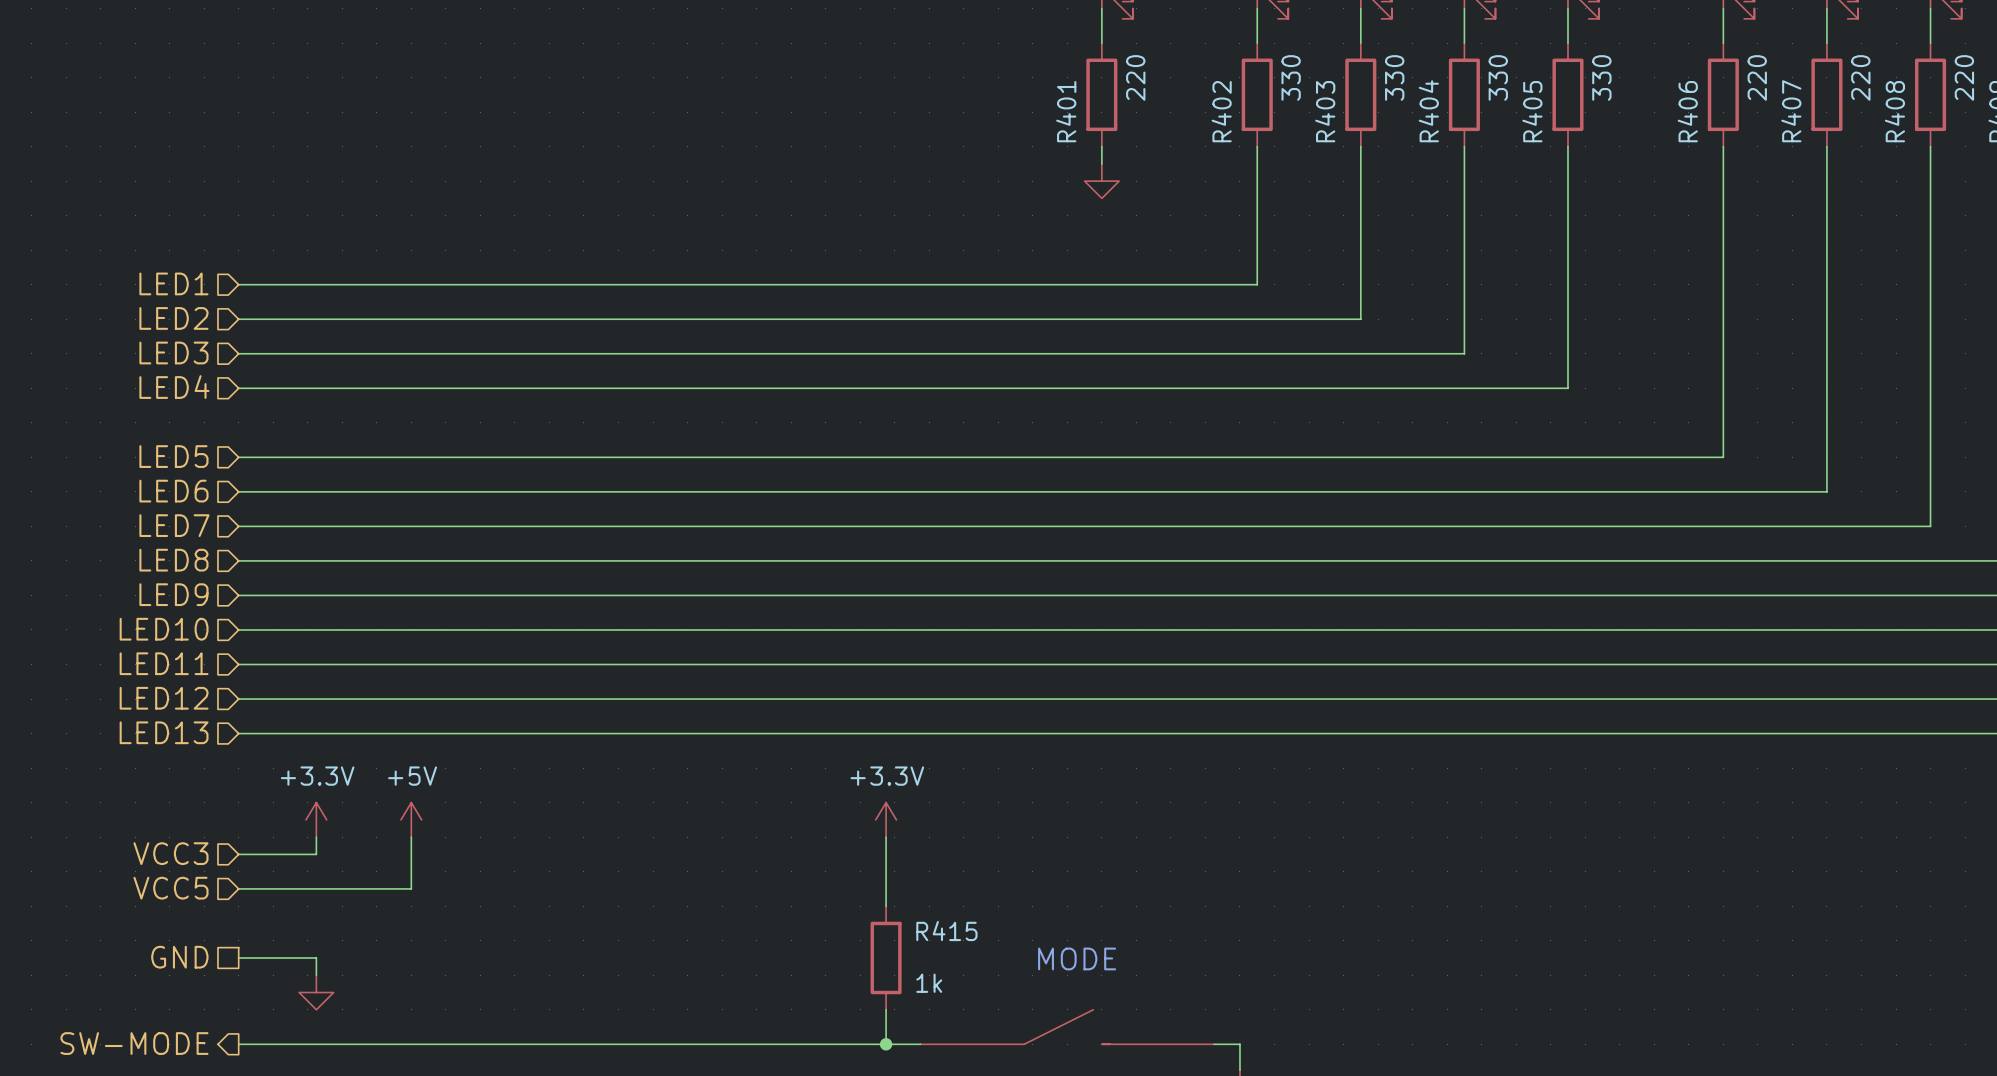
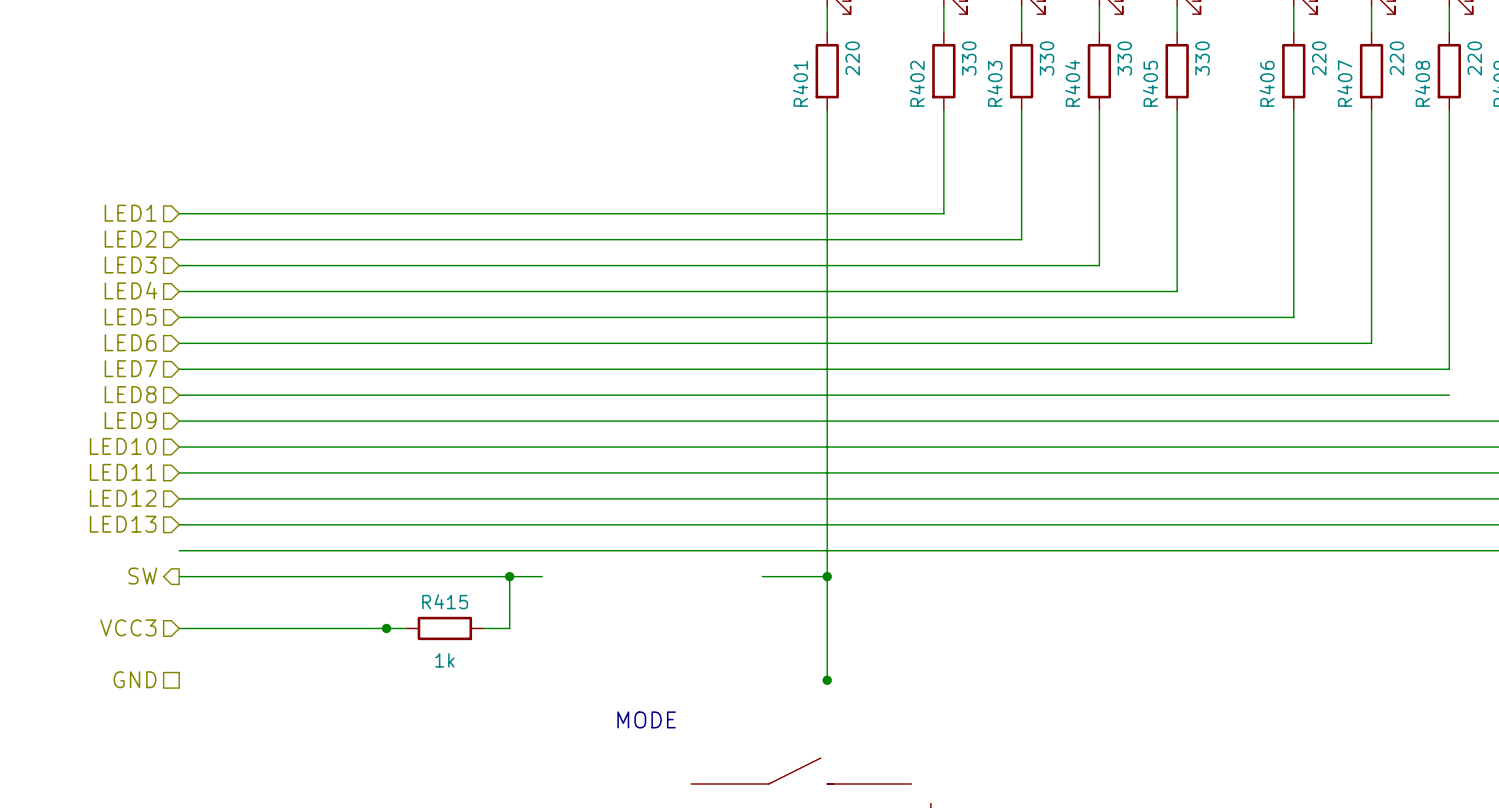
wire: none -> (827, 123) (827, 680)
power symbol: (1101, 181) -> none
hierarchical label: none -> LED5 (130, 316)
wire: none -> (179, 317) (1293, 317)
wire: (1723, 422) (1723, 457) -> (1371, 343) (1293, 343)
hierarchical label: LED5 (173, 456) -> LED6 (130, 342)
wire: (1826, 457) (1826, 491) -> none
hierarchical label: LED6 (173, 491) -> LED7 (130, 368)
wire: (1930, 491) (1930, 526) -> (1449, 369) (1371, 369)
hierarchical label: LED7 (174, 525) -> LED8 (130, 394)
hierarchical label: LED8 (173, 560) -> LED9 (130, 420)
hierarchical label: LED9 (173, 594) -> LED10 (123, 446)
hierarchical label: LED10 (164, 629) -> LED11 (123, 472)
hierarchical label: LED11 (164, 663) -> LED12 (123, 498)
hierarchical label: LED12 (164, 698) -> LED13 (123, 524)
hierarchical label: LED13 (164, 732) -> none
hierarchical label: none -> SW (142, 576)
wire: none -> (179, 576) (542, 576)
wire: none -> (509, 576) (509, 628) (483, 628)
junction: none -> (509, 576)
wire: none -> (762, 576) (827, 576)
junction: none -> (827, 576)
power symbol: +3.3V (316, 819) -> none
power symbol: +5V (411, 819) -> none
power symbol: +3.3V (886, 819) -> none
wire: none -> (179, 628) (406, 628)
wire: (316, 837) (316, 854) (238, 854) -> none
wire: (411, 837) (411, 888) (238, 888) -> none
junction: none -> (386, 628)
wire: (886, 837) (886, 906) -> none
hierarchical label position: VCC3 (170, 853) -> VCC3 (128, 627)
hierarchical label: VCC5 (170, 888) -> none
junction: none -> (827, 680)
R415 name position: R415 (946, 931) -> R415 (445, 601)
hierarchical label position: GND (179, 957) -> GND (135, 679)
wire: (238, 957) (316, 957) (316, 975) -> none
R415 rotation: 0° (886, 957) -> 90° clockwise (444, 628)
R415 position: (886, 957) -> (444, 628)
text position: MODE (1077, 958) -> MODE (646, 719)
power symbol: (316, 992) -> none
wire: (886, 1009) (886, 1044) -> none
hierarchical label: SW-MODE (134, 1043) -> none
wire: (238, 1044) (920, 1044) -> none
junction: (886, 1044) -> none
wire: (1214, 1044) (1239, 1044) (1239, 1070) -> none

